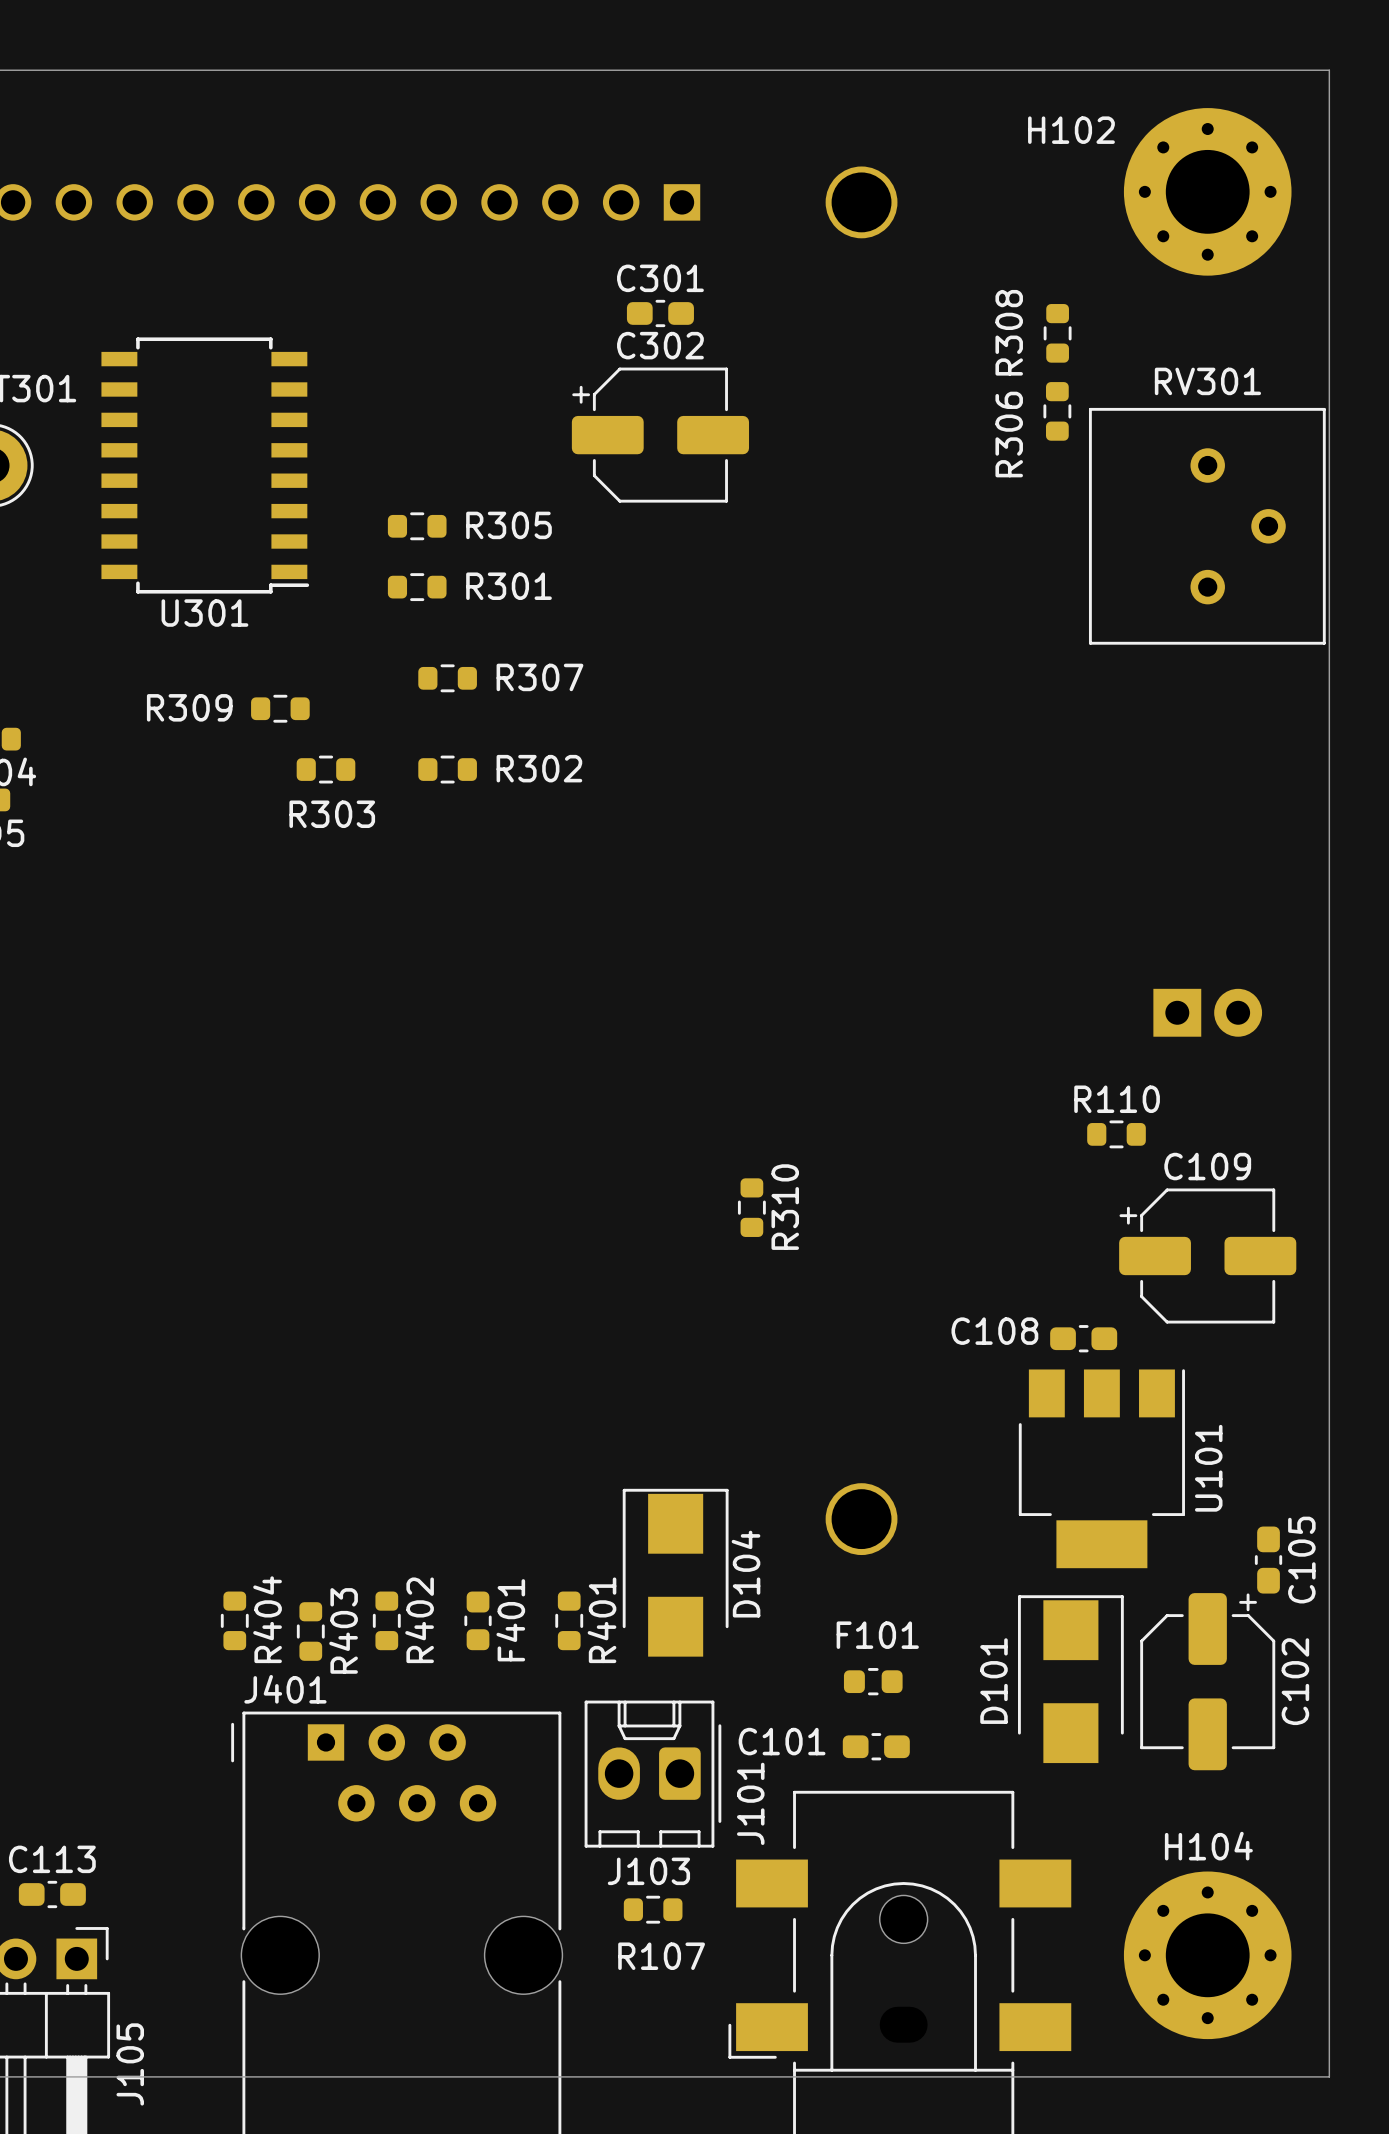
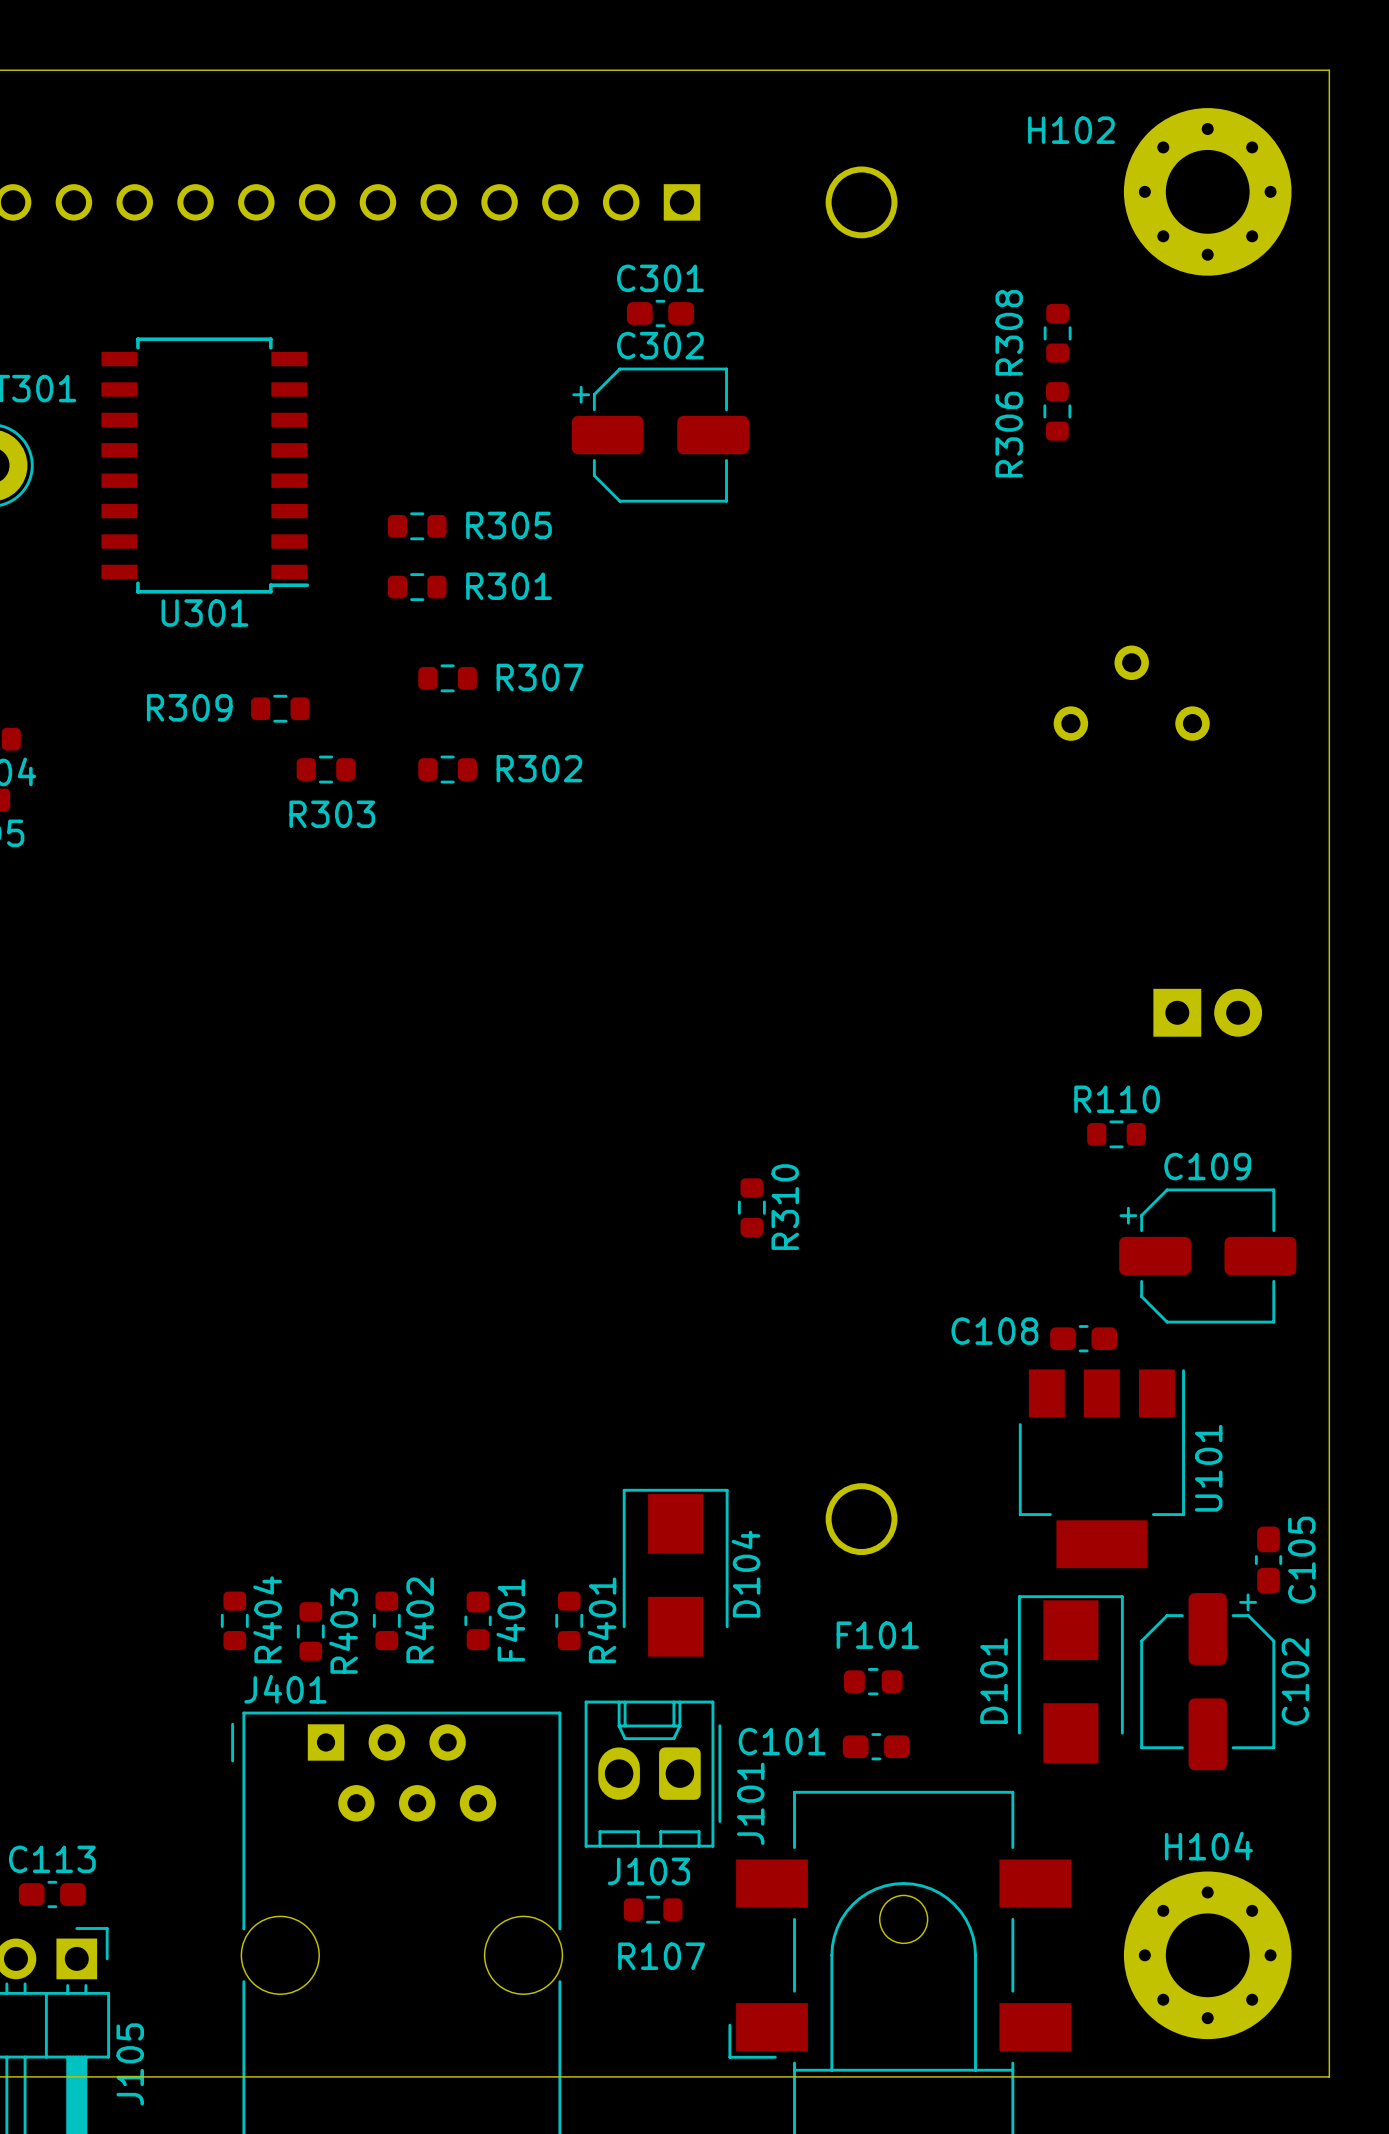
RV301: (1207, 526) -> none
part: none -> (1131, 693)

